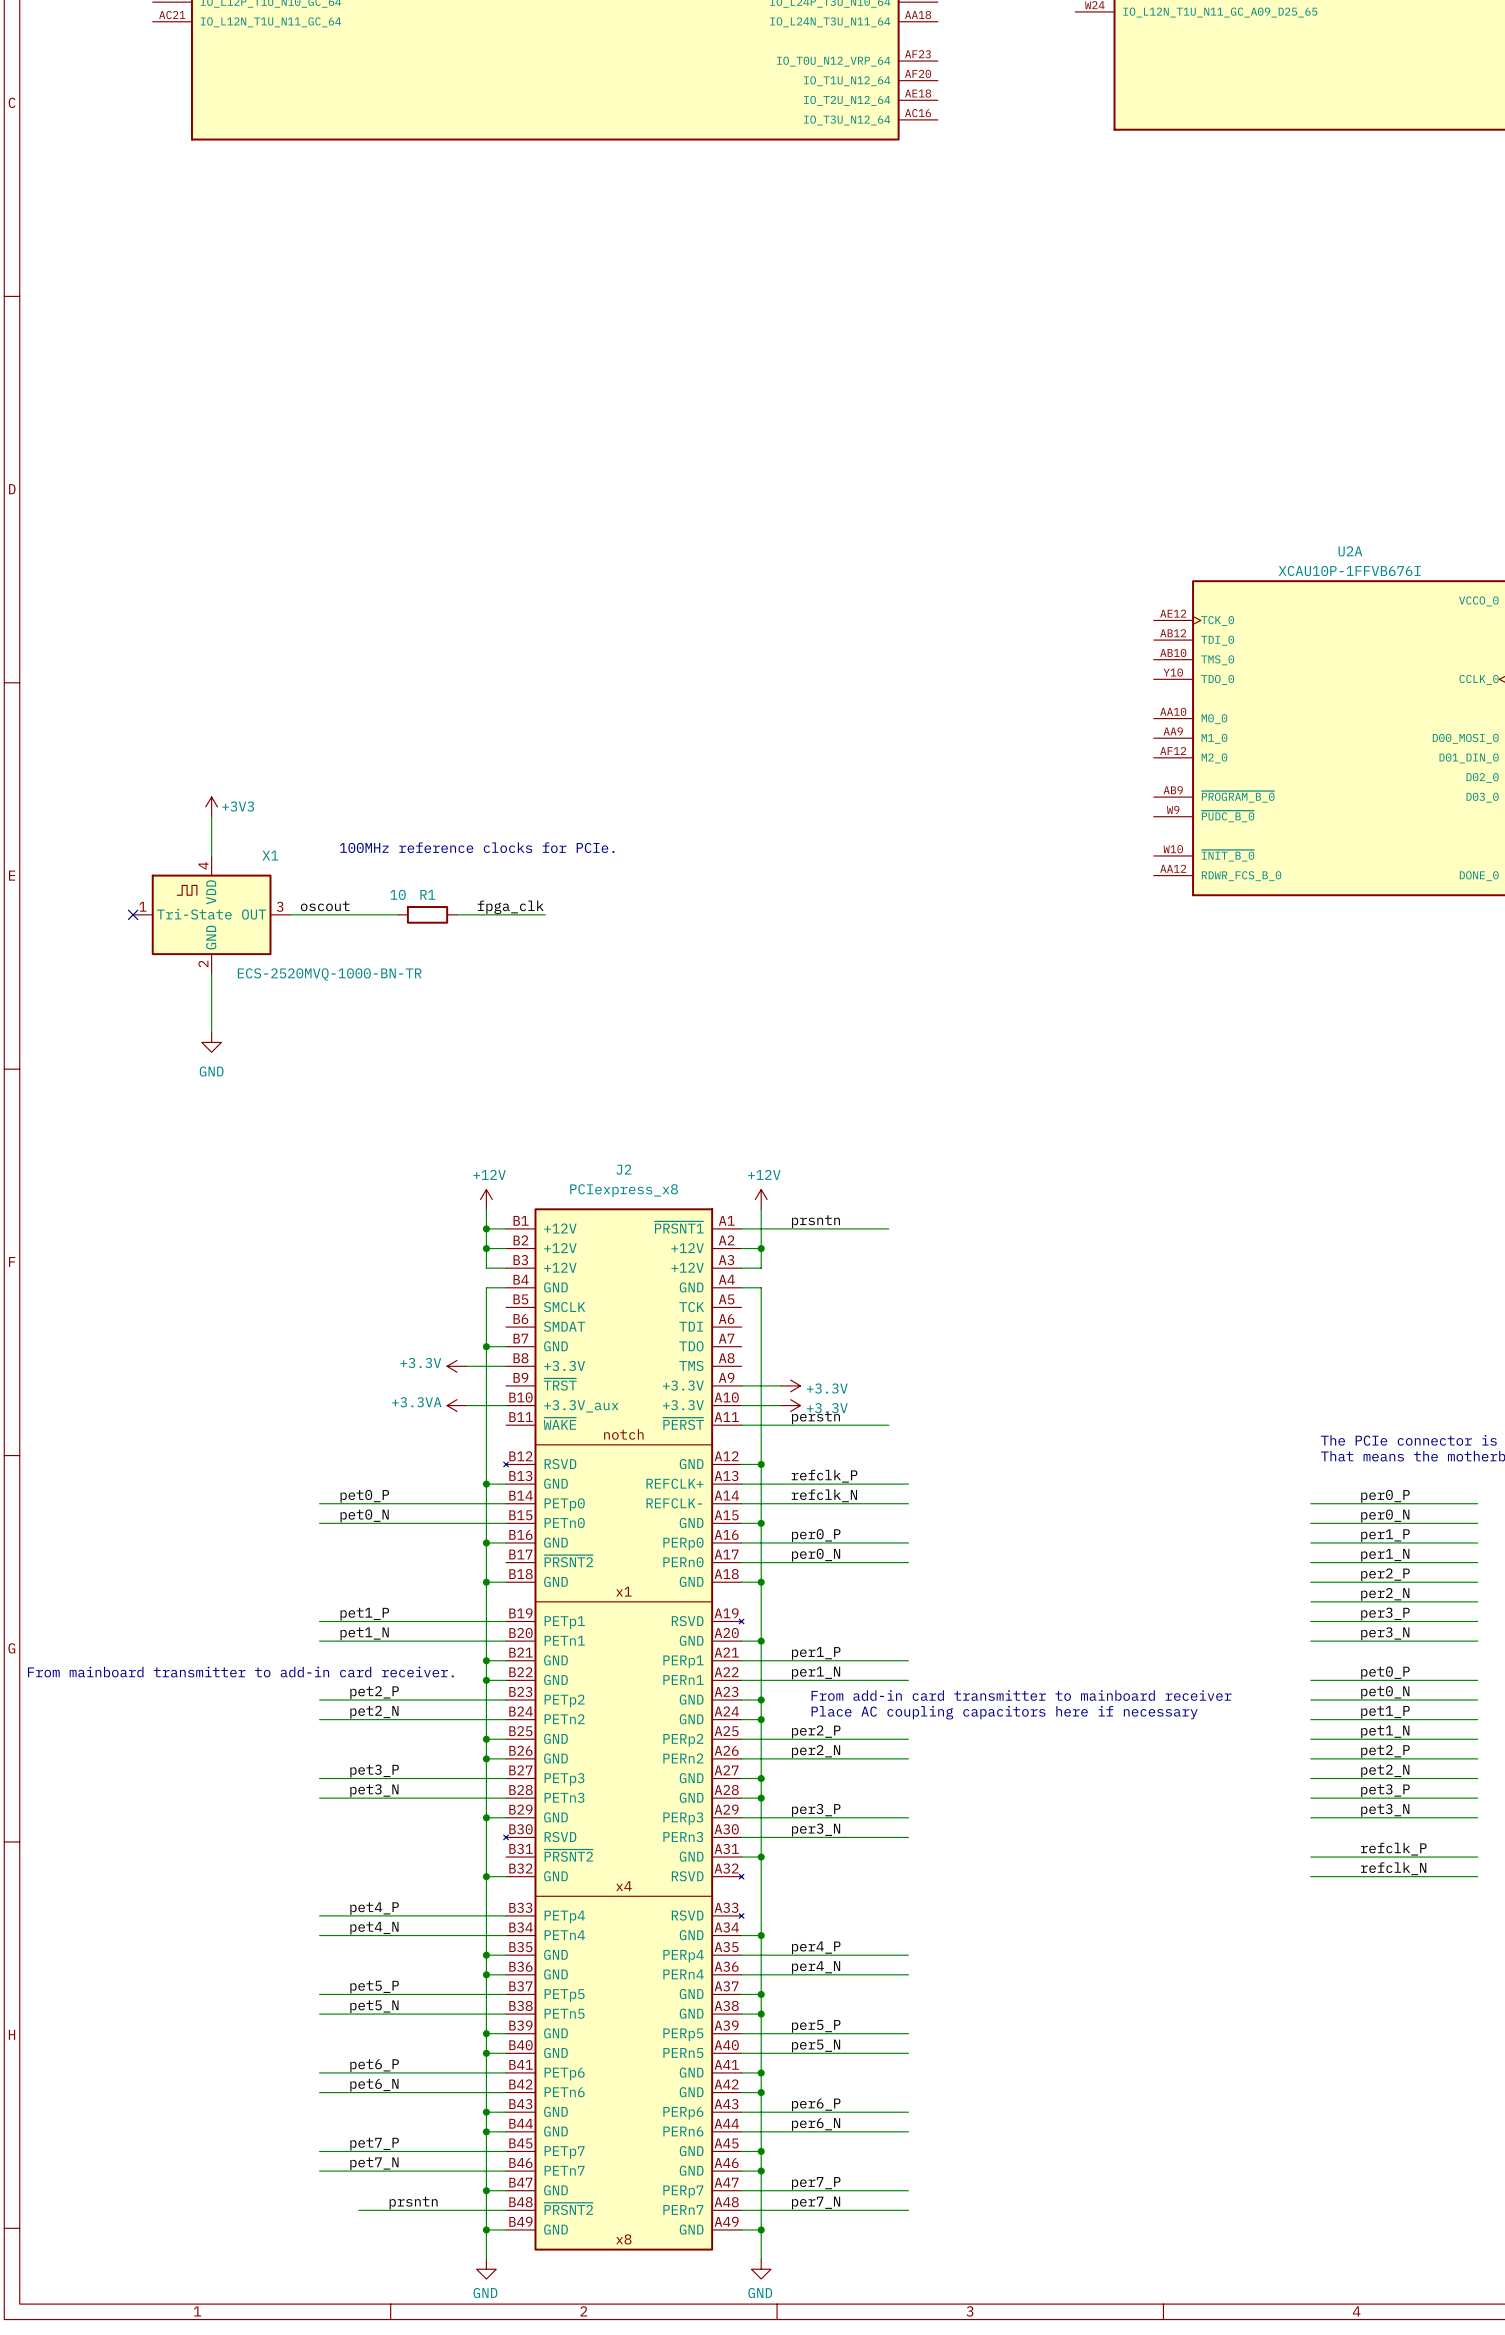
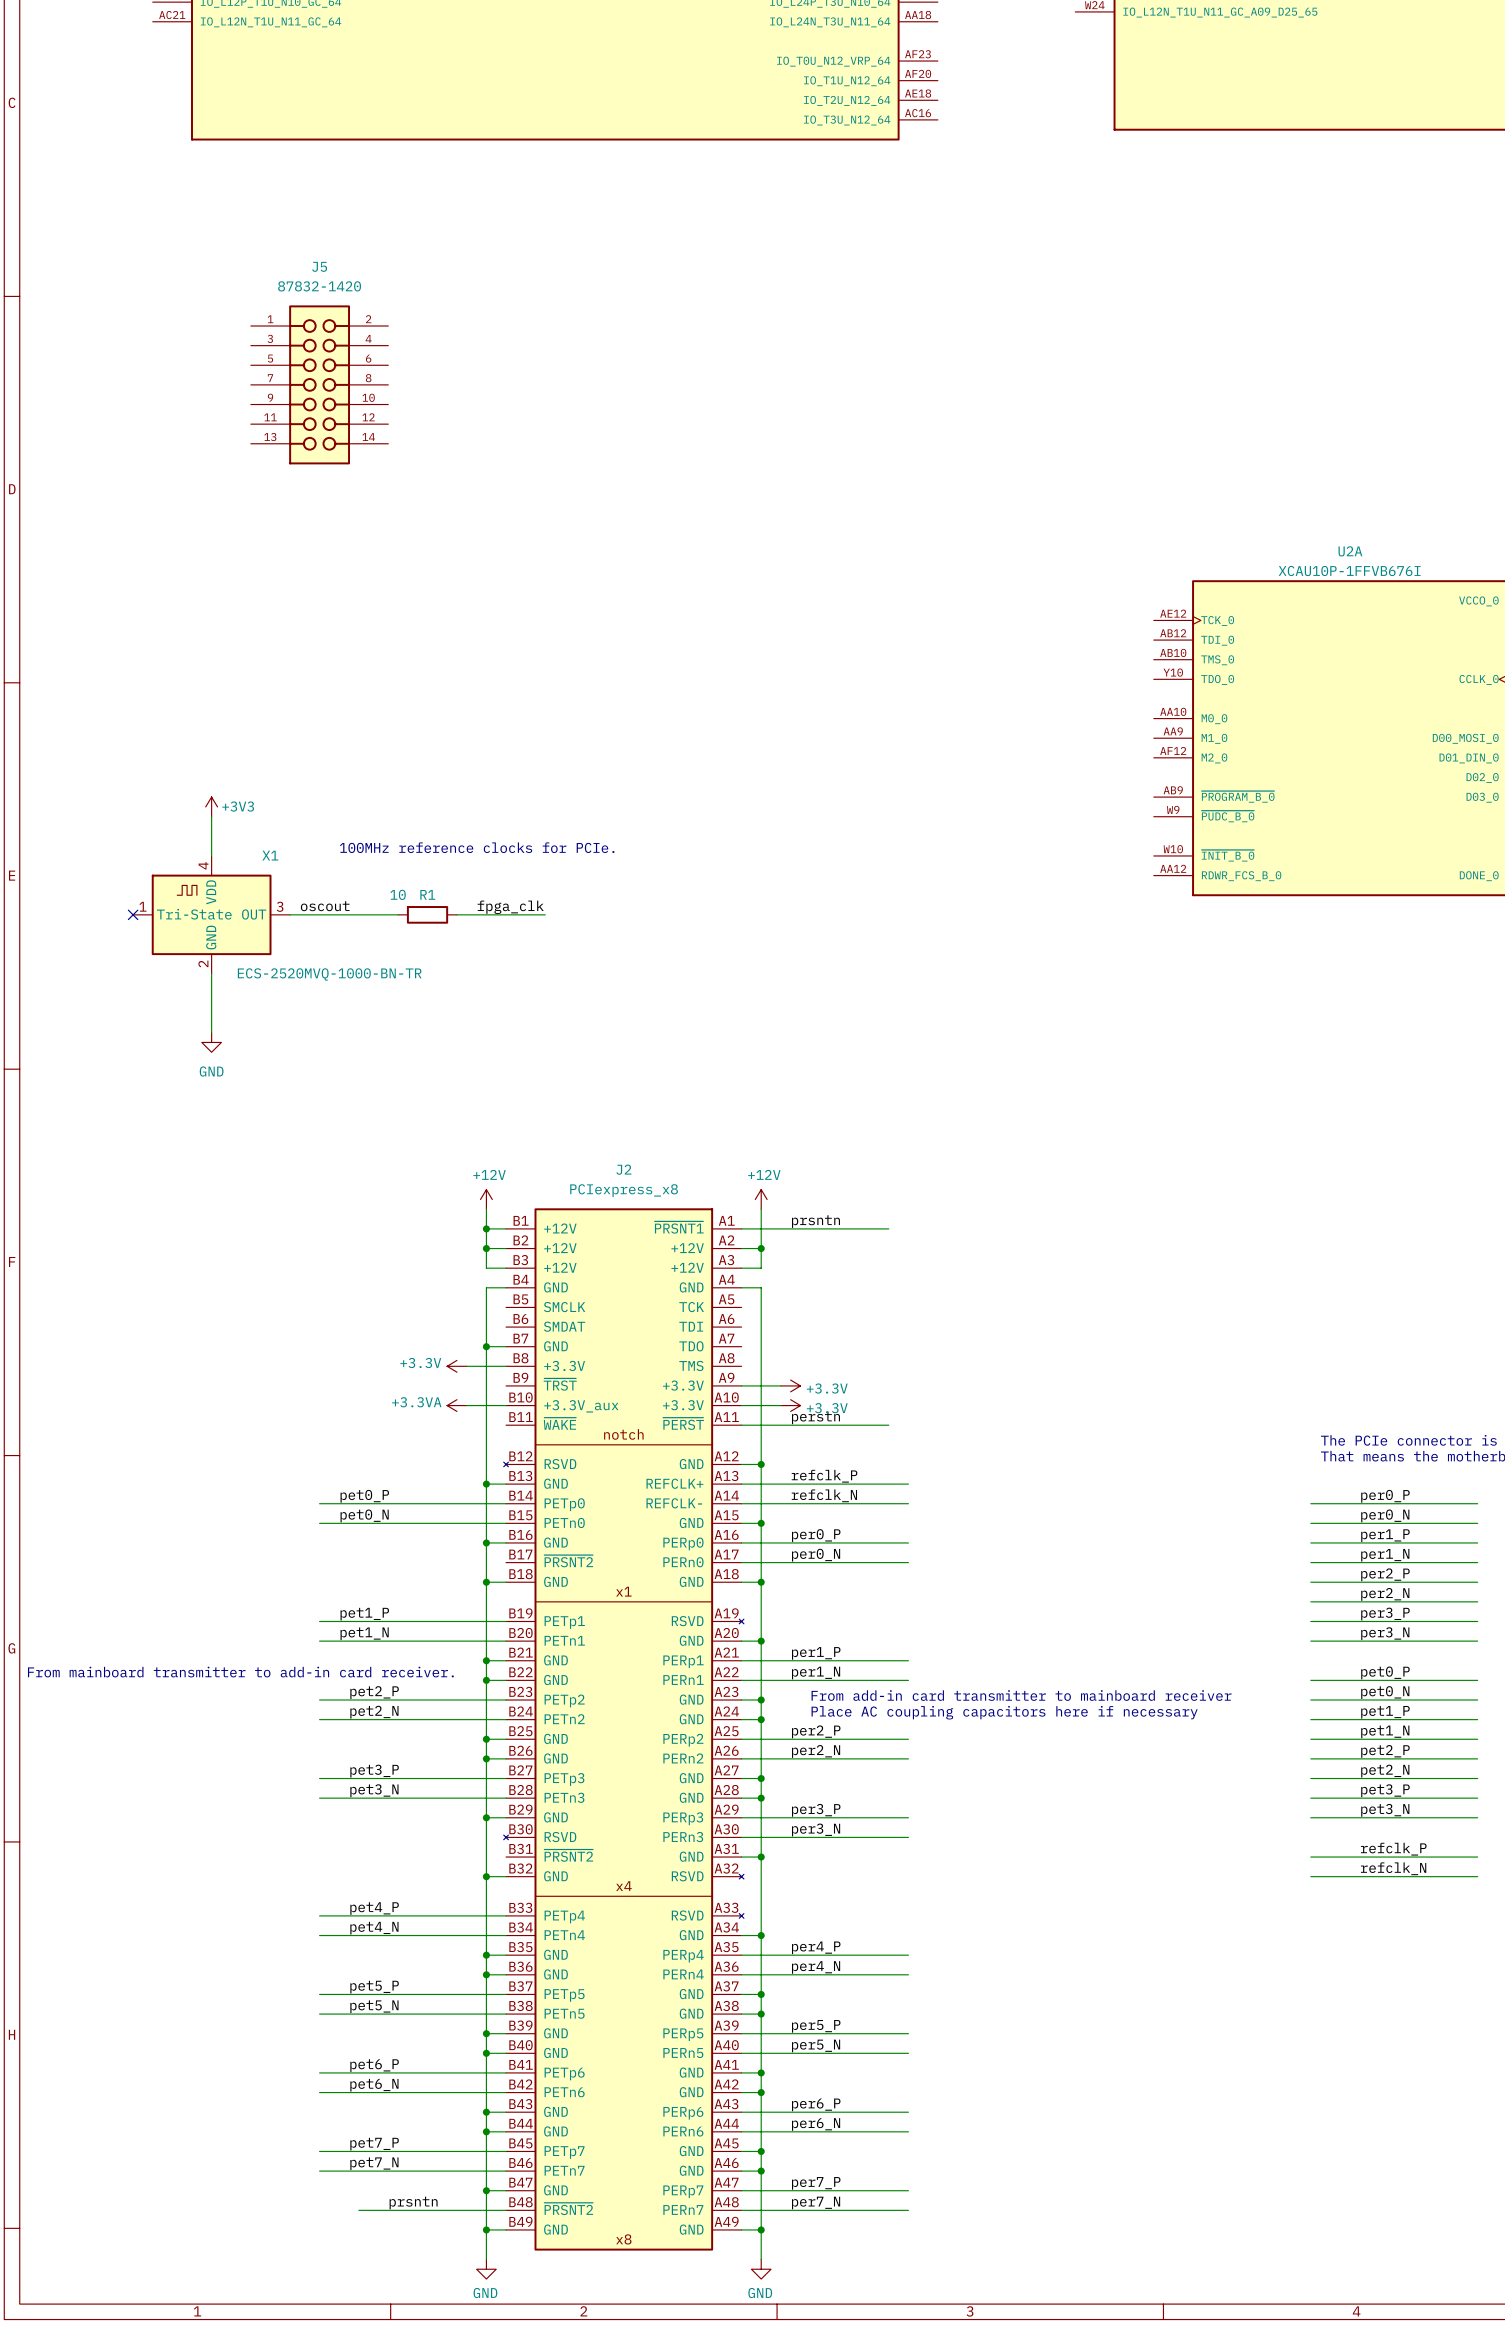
J5: none -> 87832-1420 (319, 384)

